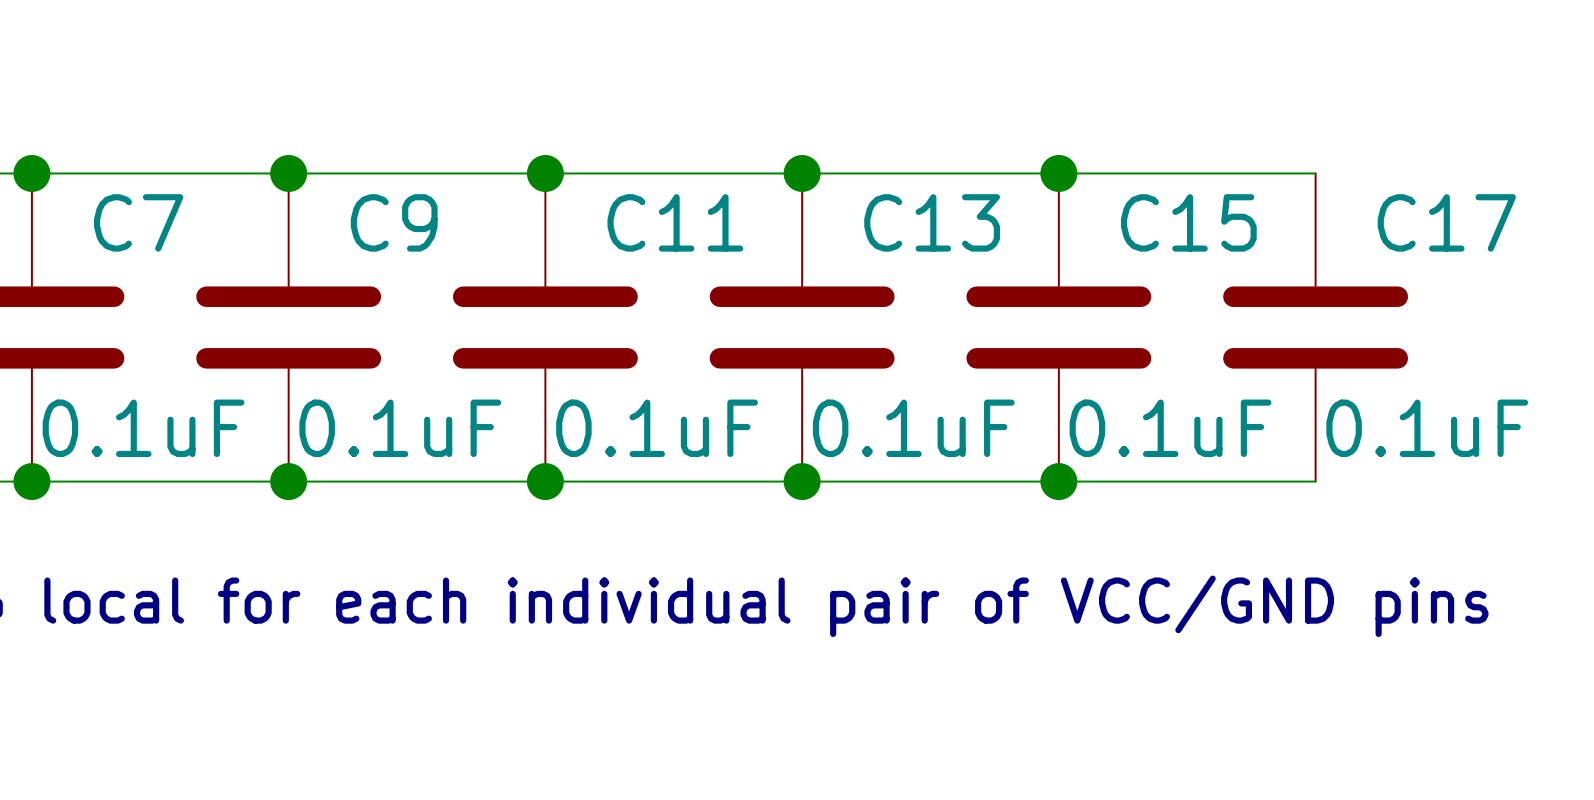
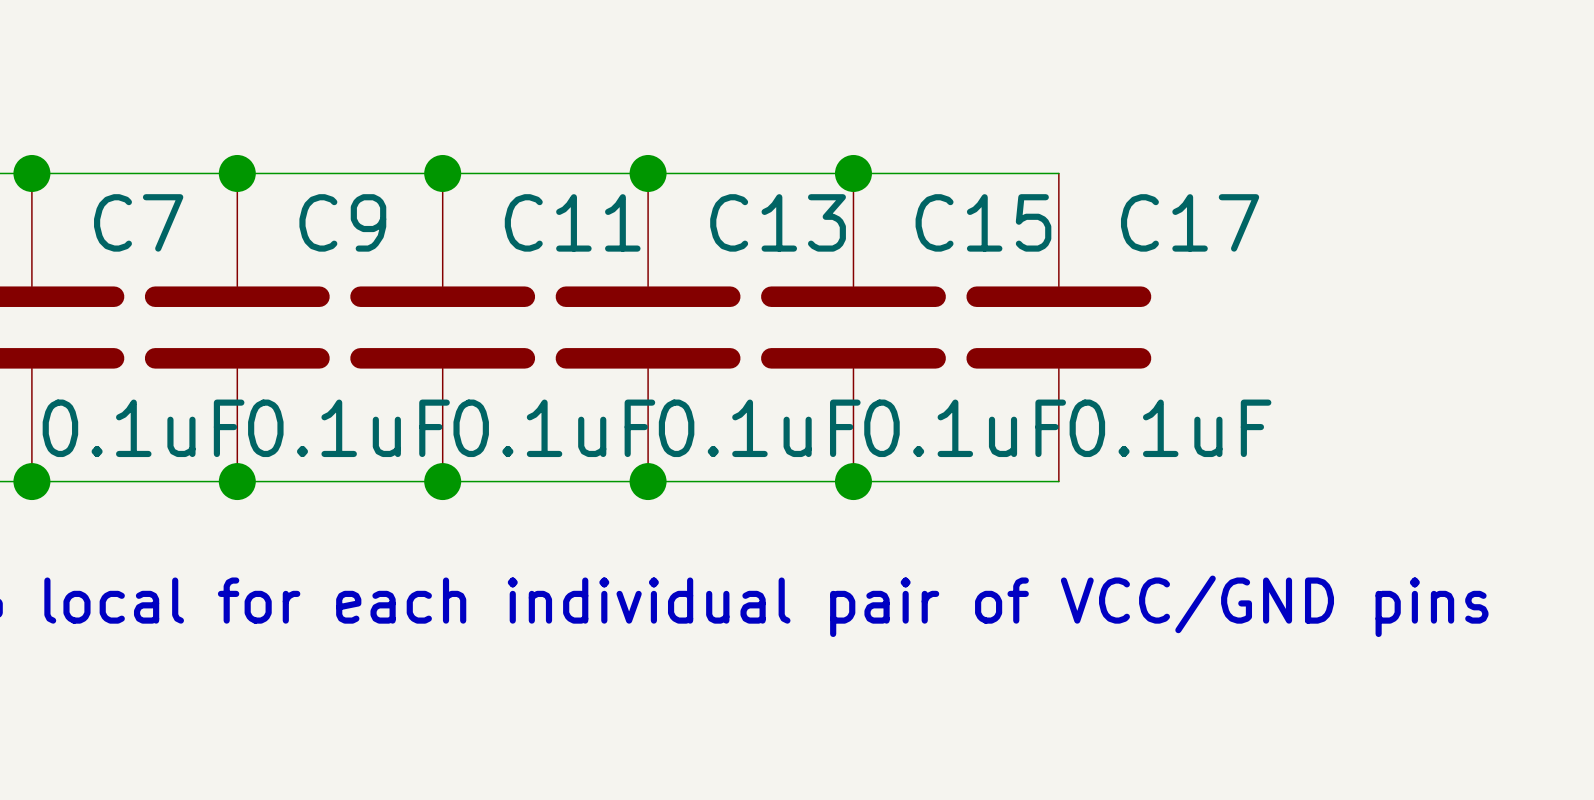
junction position: (288, 173) -> (237, 173)
junction: none -> (442, 173)
junction: (545, 173) -> none
junction: none -> (648, 173)
junction position: (802, 173) -> (853, 173)
wire: (1058, 173) (1315, 173) -> none
junction: (1058, 173) -> none
C15 name: C15 (1188, 222) -> C17 (1190, 222)
C9 position: (288, 327) -> (237, 327)
C11 position: (545, 327) -> (442, 327)
C13 position: (802, 327) -> (648, 327)
C15: none -> 0.1uF (853, 327)
C17: 0.1uF (1315, 327) -> none
junction position: (288, 481) -> (237, 481)
junction: none -> (442, 481)
junction: (545, 481) -> none
junction: none -> (648, 481)
junction position: (802, 481) -> (853, 481)
wire: (1058, 481) (1315, 481) -> none
junction: (1058, 481) -> none

